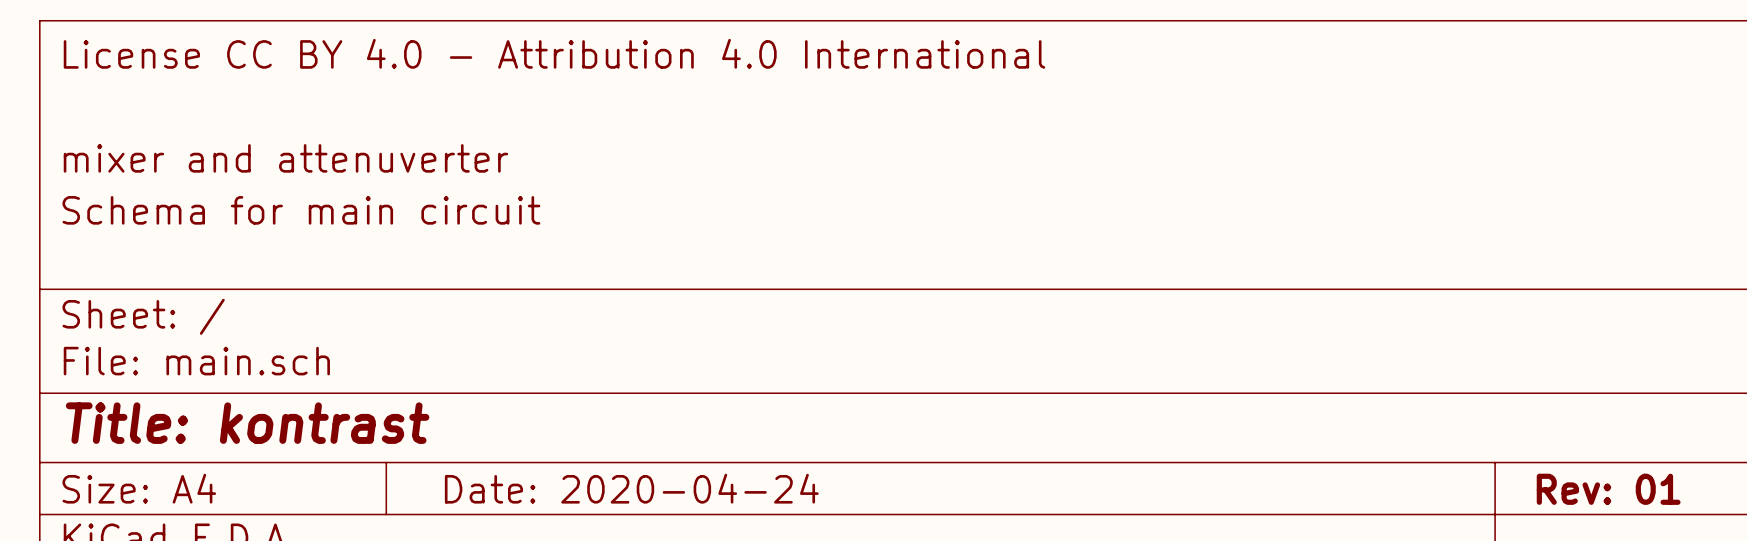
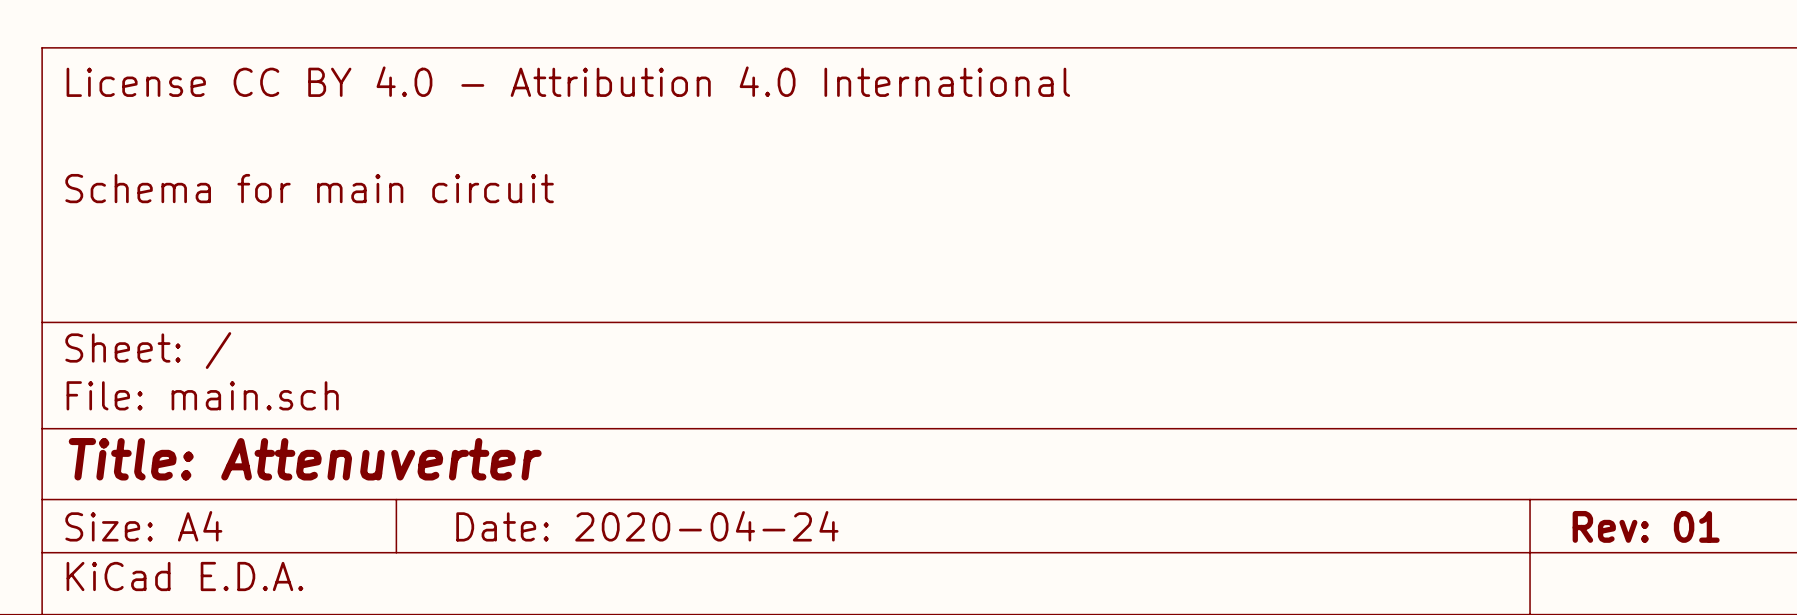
title block: mixer and attenuverter (285, 158) -> Schema for main circuit (309, 188)
title block: Schema for main circuit (301, 210) -> none
title block: Title: kontrast (247, 423) -> Title: Attenuverter (305, 459)

